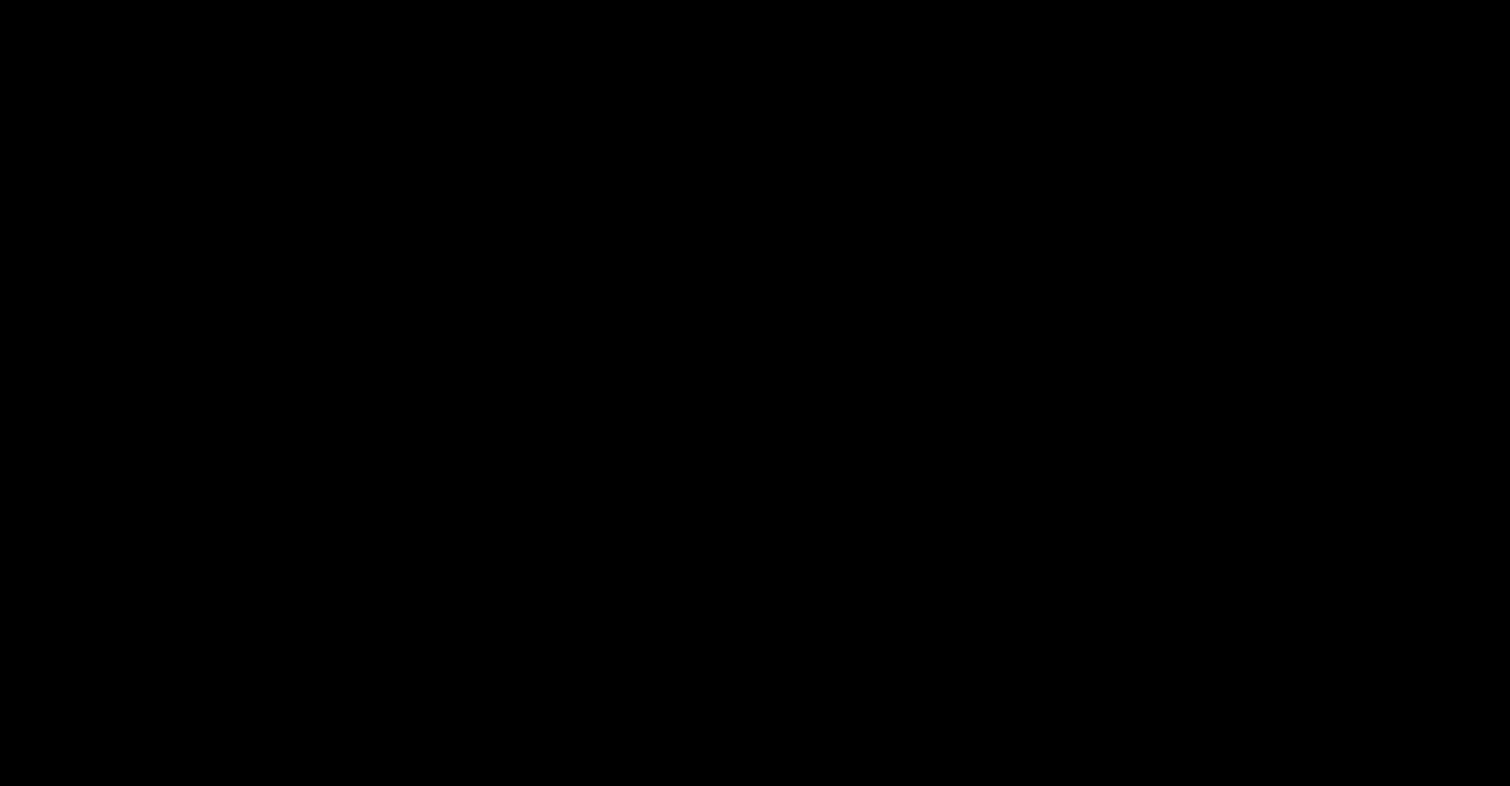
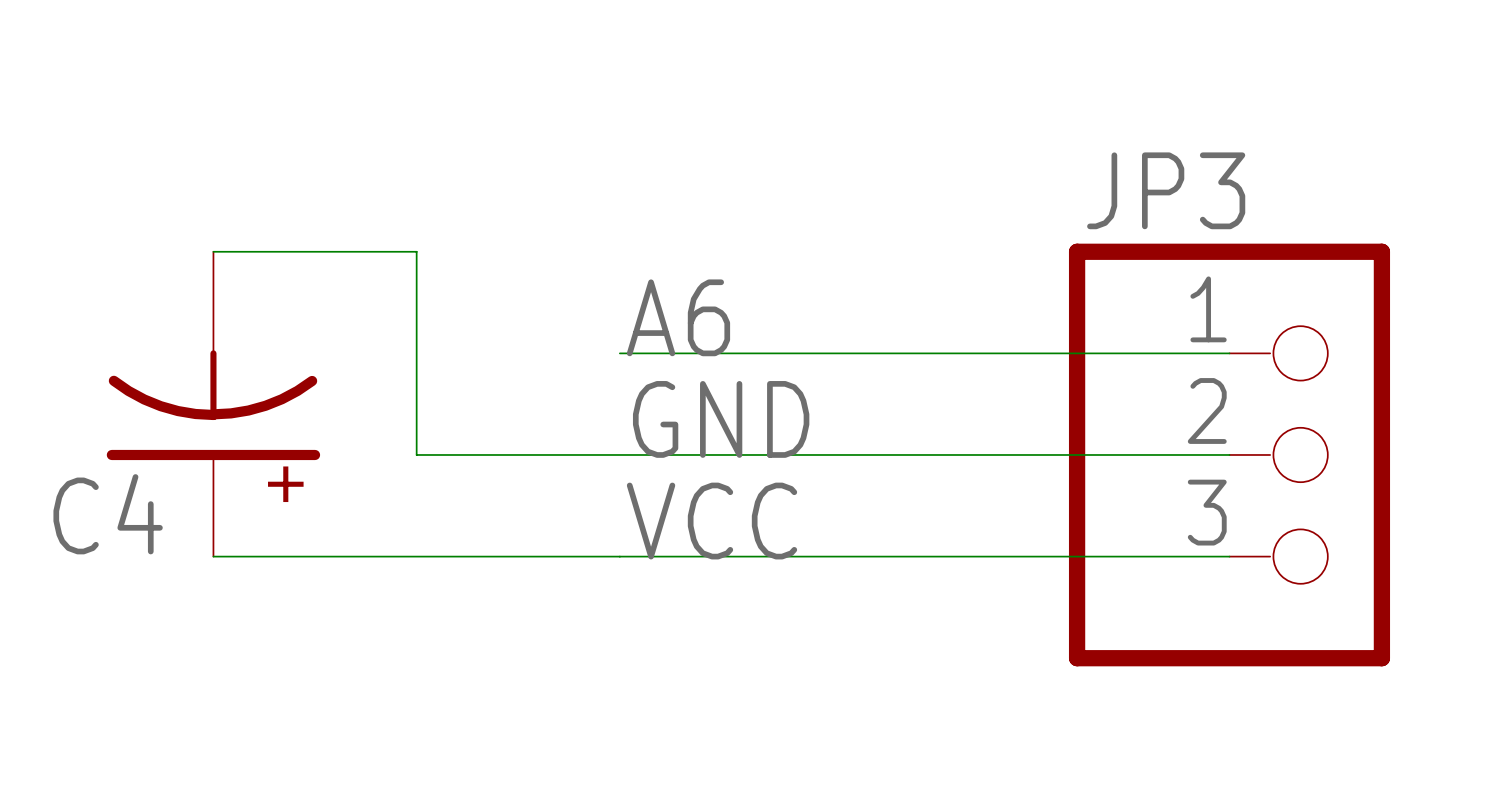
wire: none -> (213, 251) (416, 251) (416, 454) (1229, 454)
label: none -> A6 (678, 317)
wire: none -> (619, 353) (1229, 353)
C4: none -> (213, 404)
label: none -> GND (721, 419)
JP3: none -> (1229, 454)
label: none -> VCC (712, 521)
wire: none -> (213, 556) (1229, 556)

